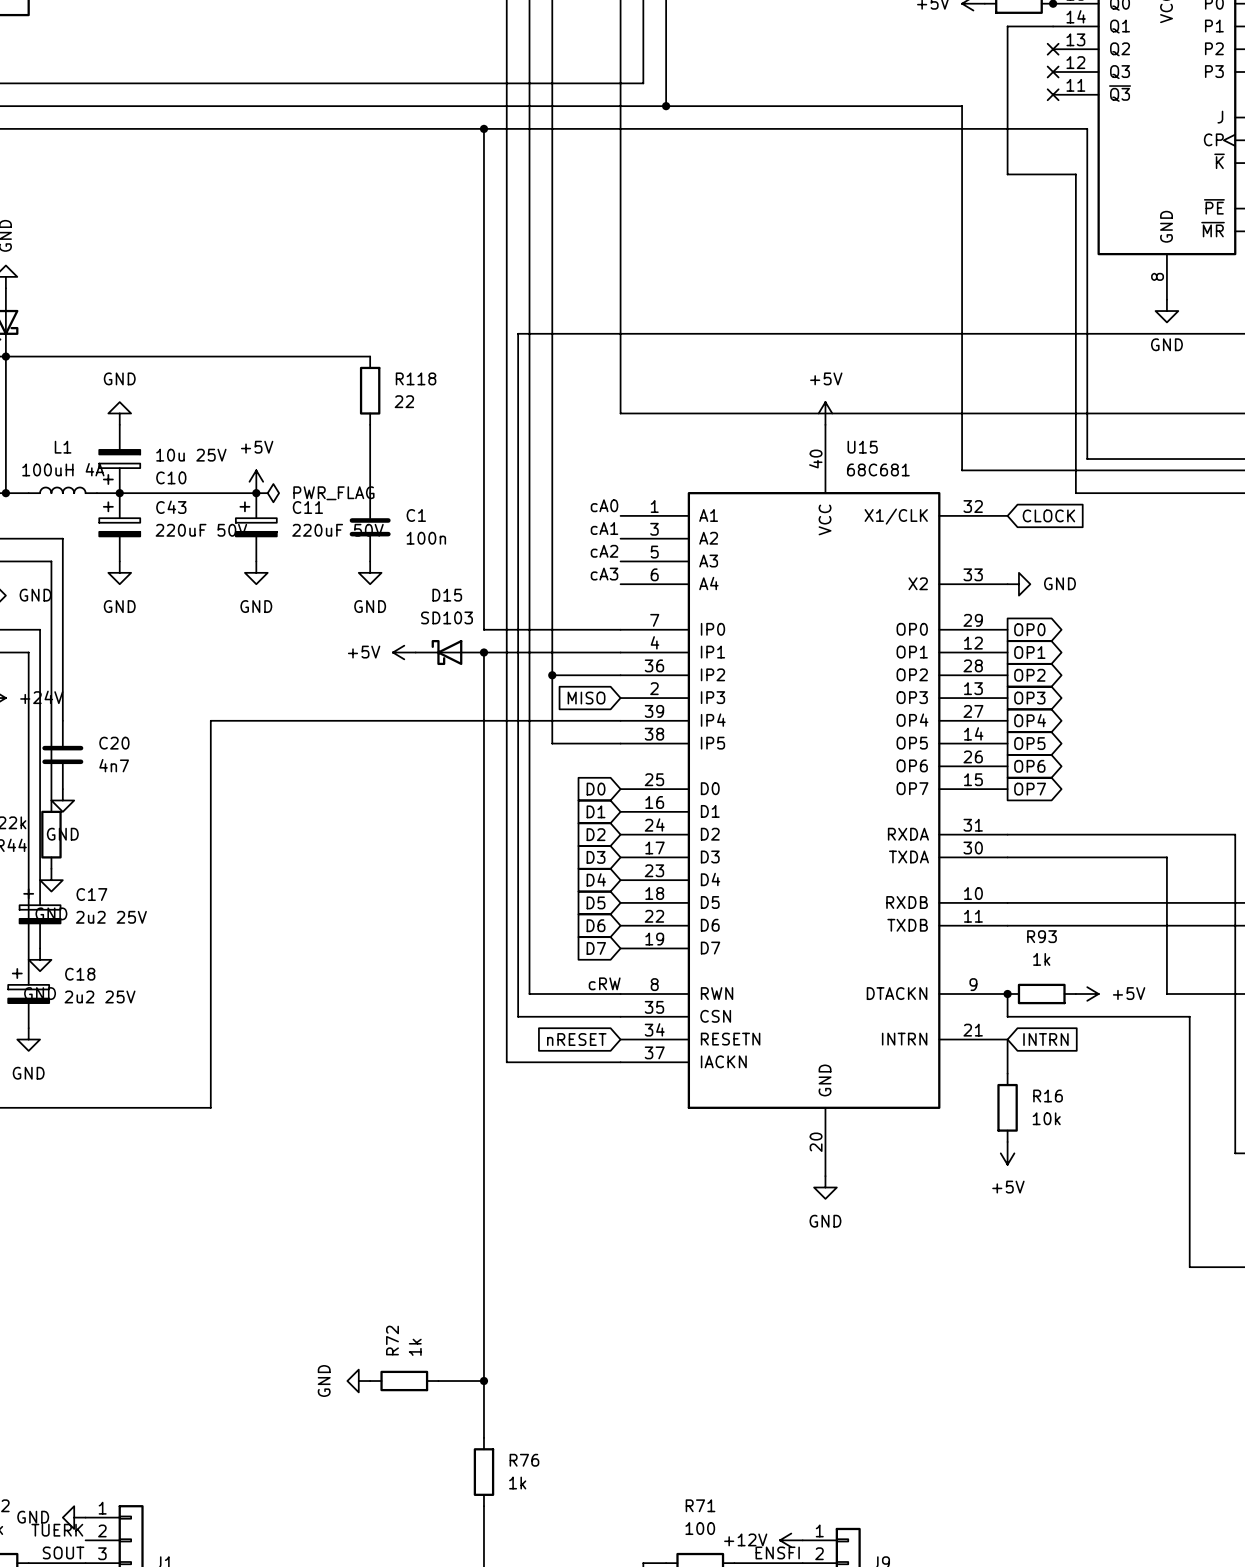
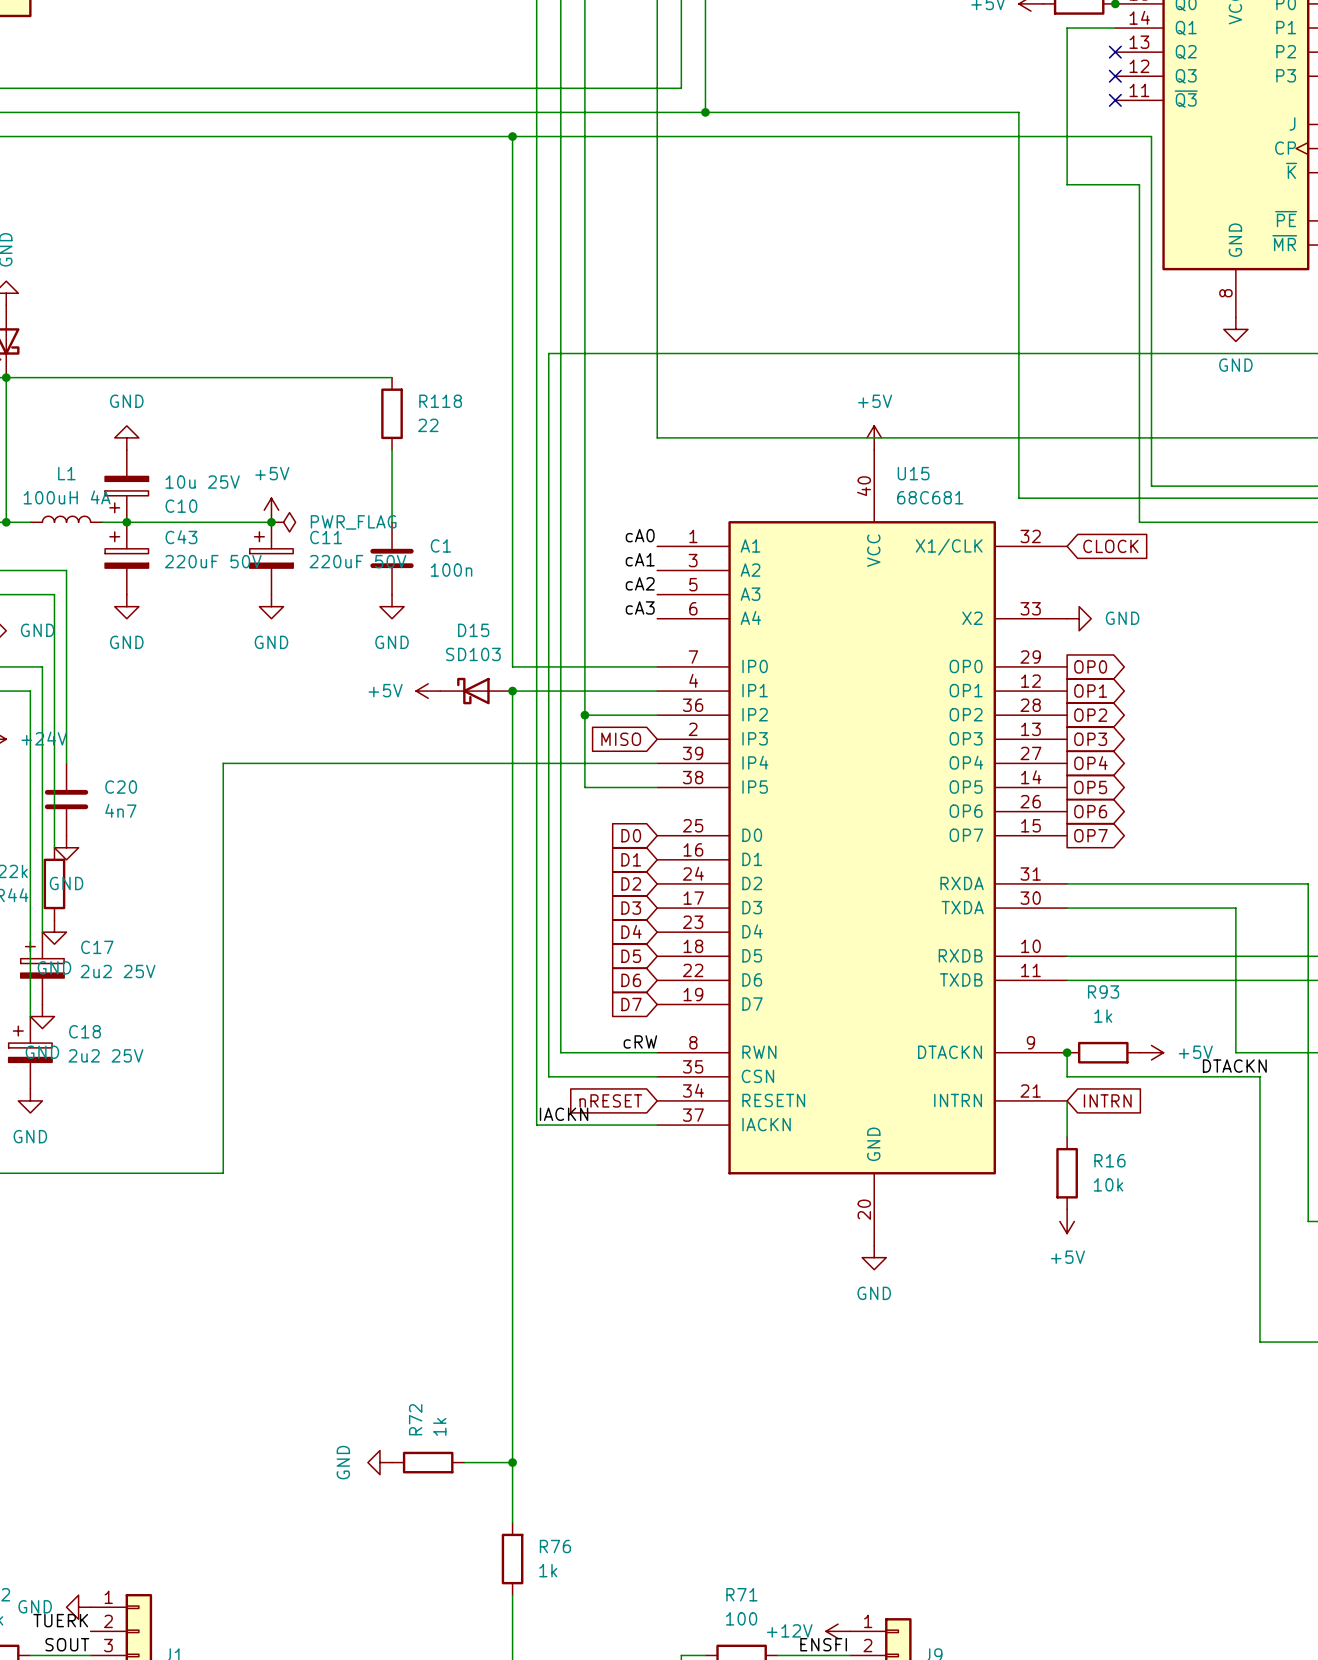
label: none -> DTACKN (1234, 1066)
label: none -> IACKN (564, 1114)

